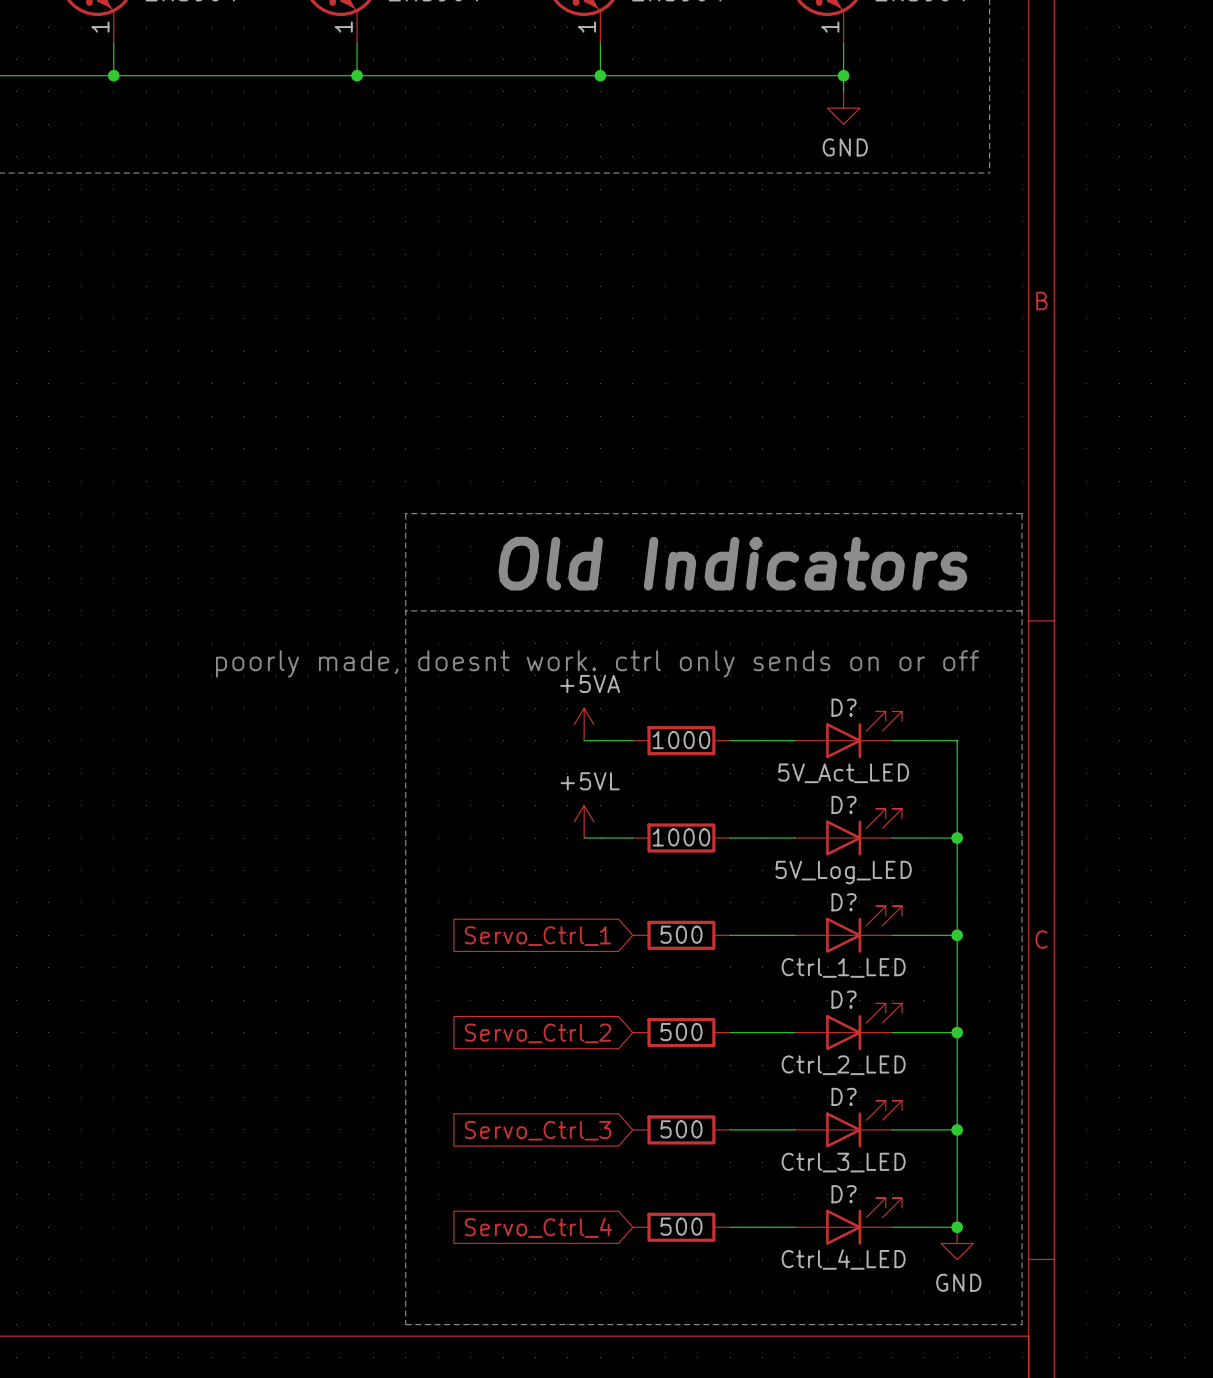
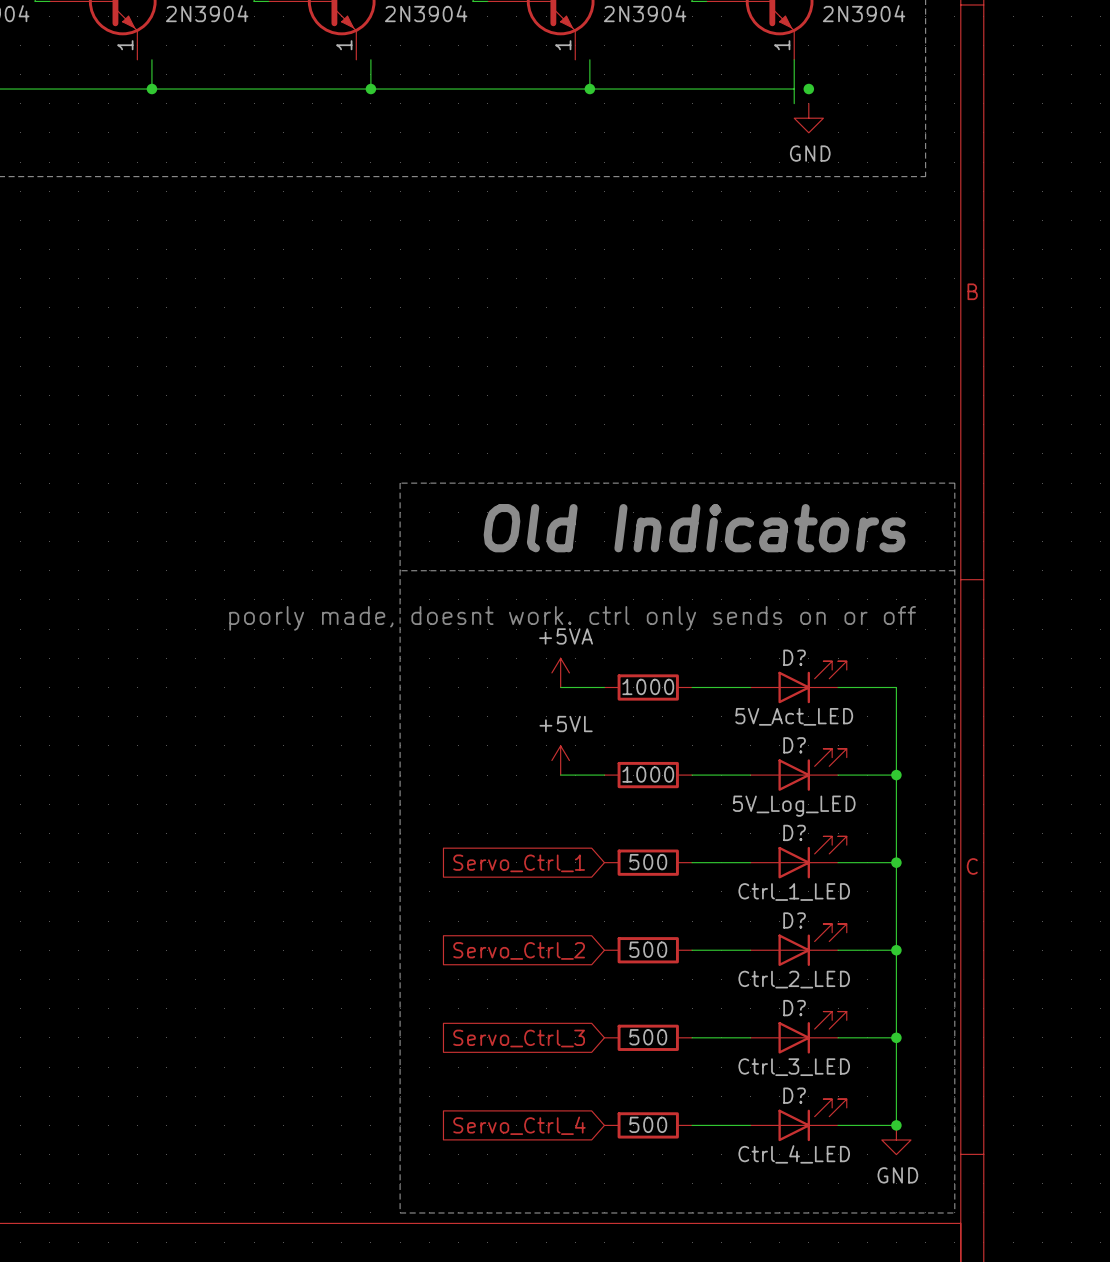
wire: (113, 43) (113, 75) -> (151, 59) (151, 89)
wire: (357, 43) (357, 75) -> (370, 59) (370, 89)
wire: (600, 43) (600, 75) -> (589, 59) (589, 89)
junction position: (113, 75) -> (151, 89)
junction position: (357, 75) -> (370, 89)
junction position: (600, 75) -> (589, 89)
junction position: (843, 75) -> (808, 89)
power symbol position: GND (843, 108) -> GND (808, 118)

